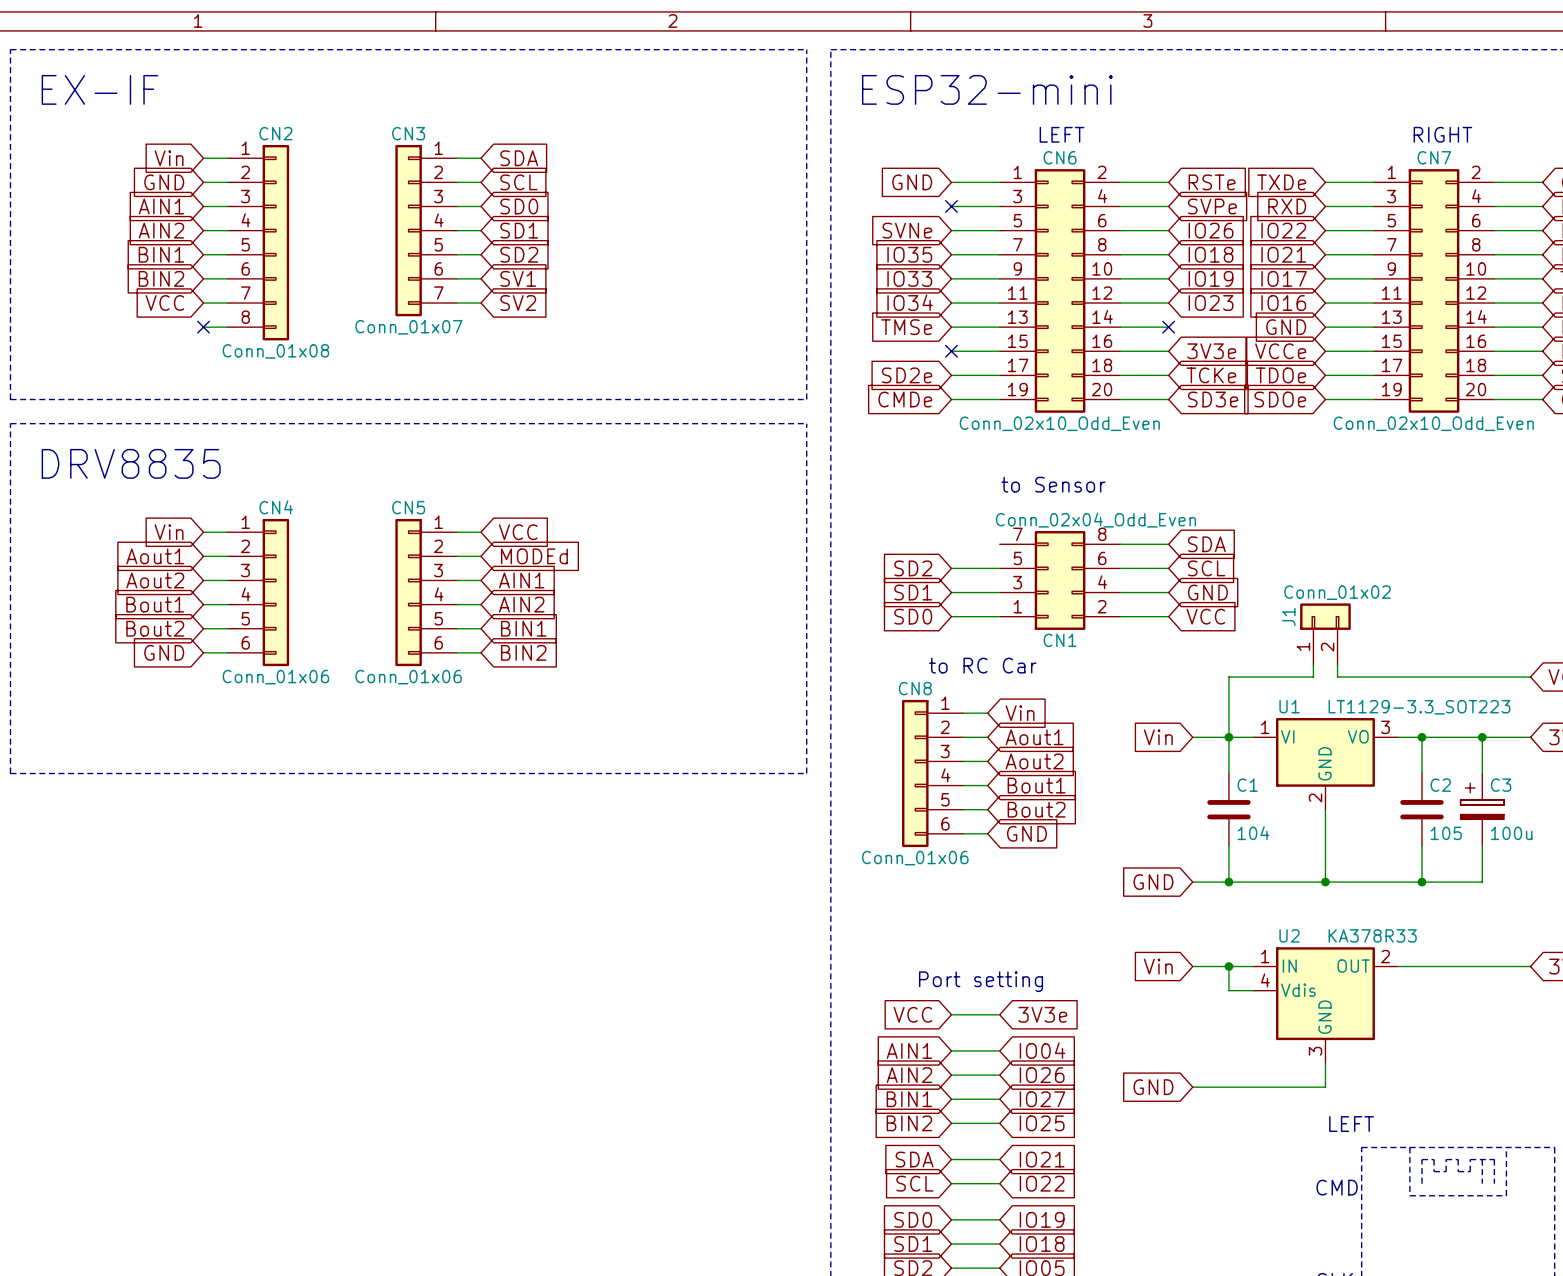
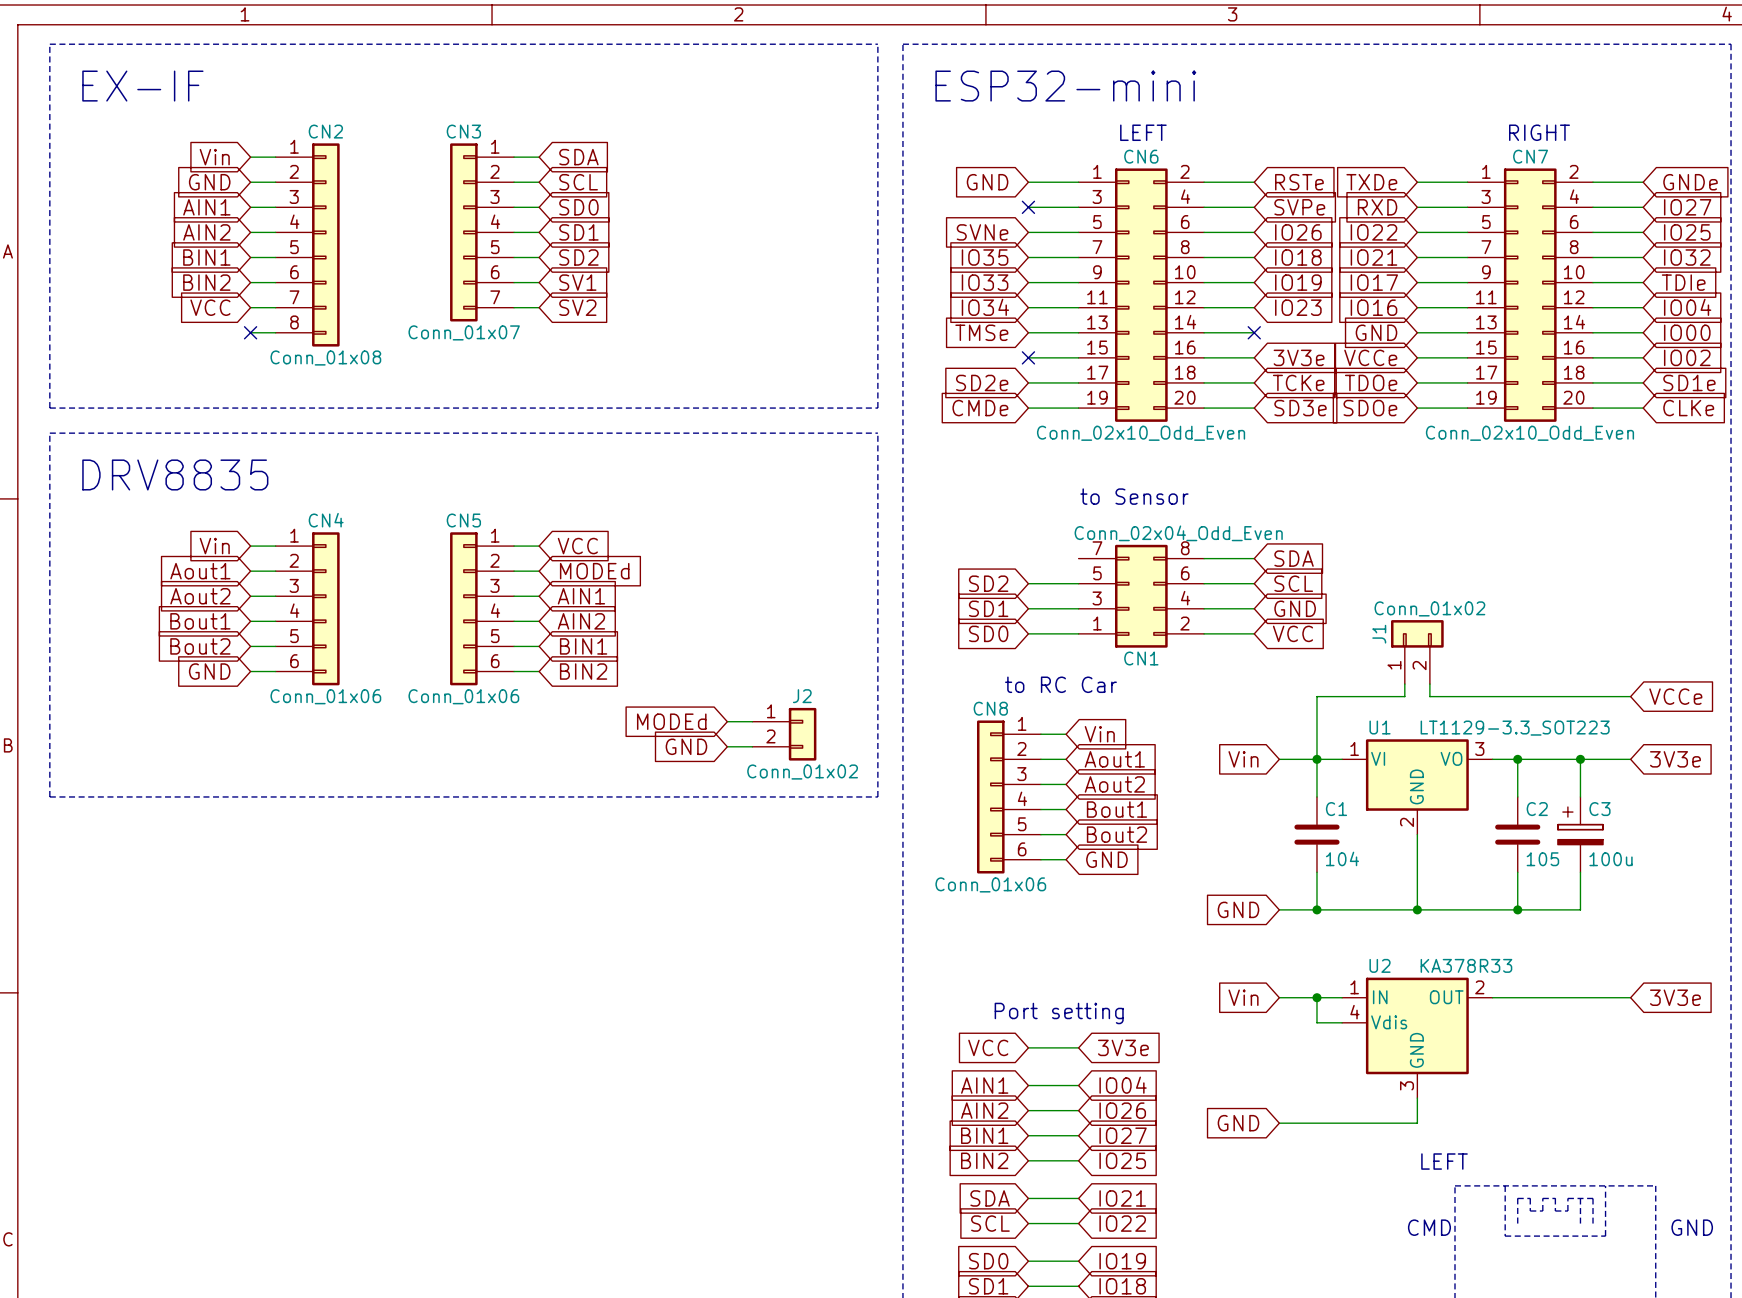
global label: none -> MODEd (671, 721)
wire: none -> (727, 721) (752, 721)
J2: none -> Conn_01x02 (784, 734)
global label: none -> GND (686, 746)
wire: none -> (727, 746) (752, 746)

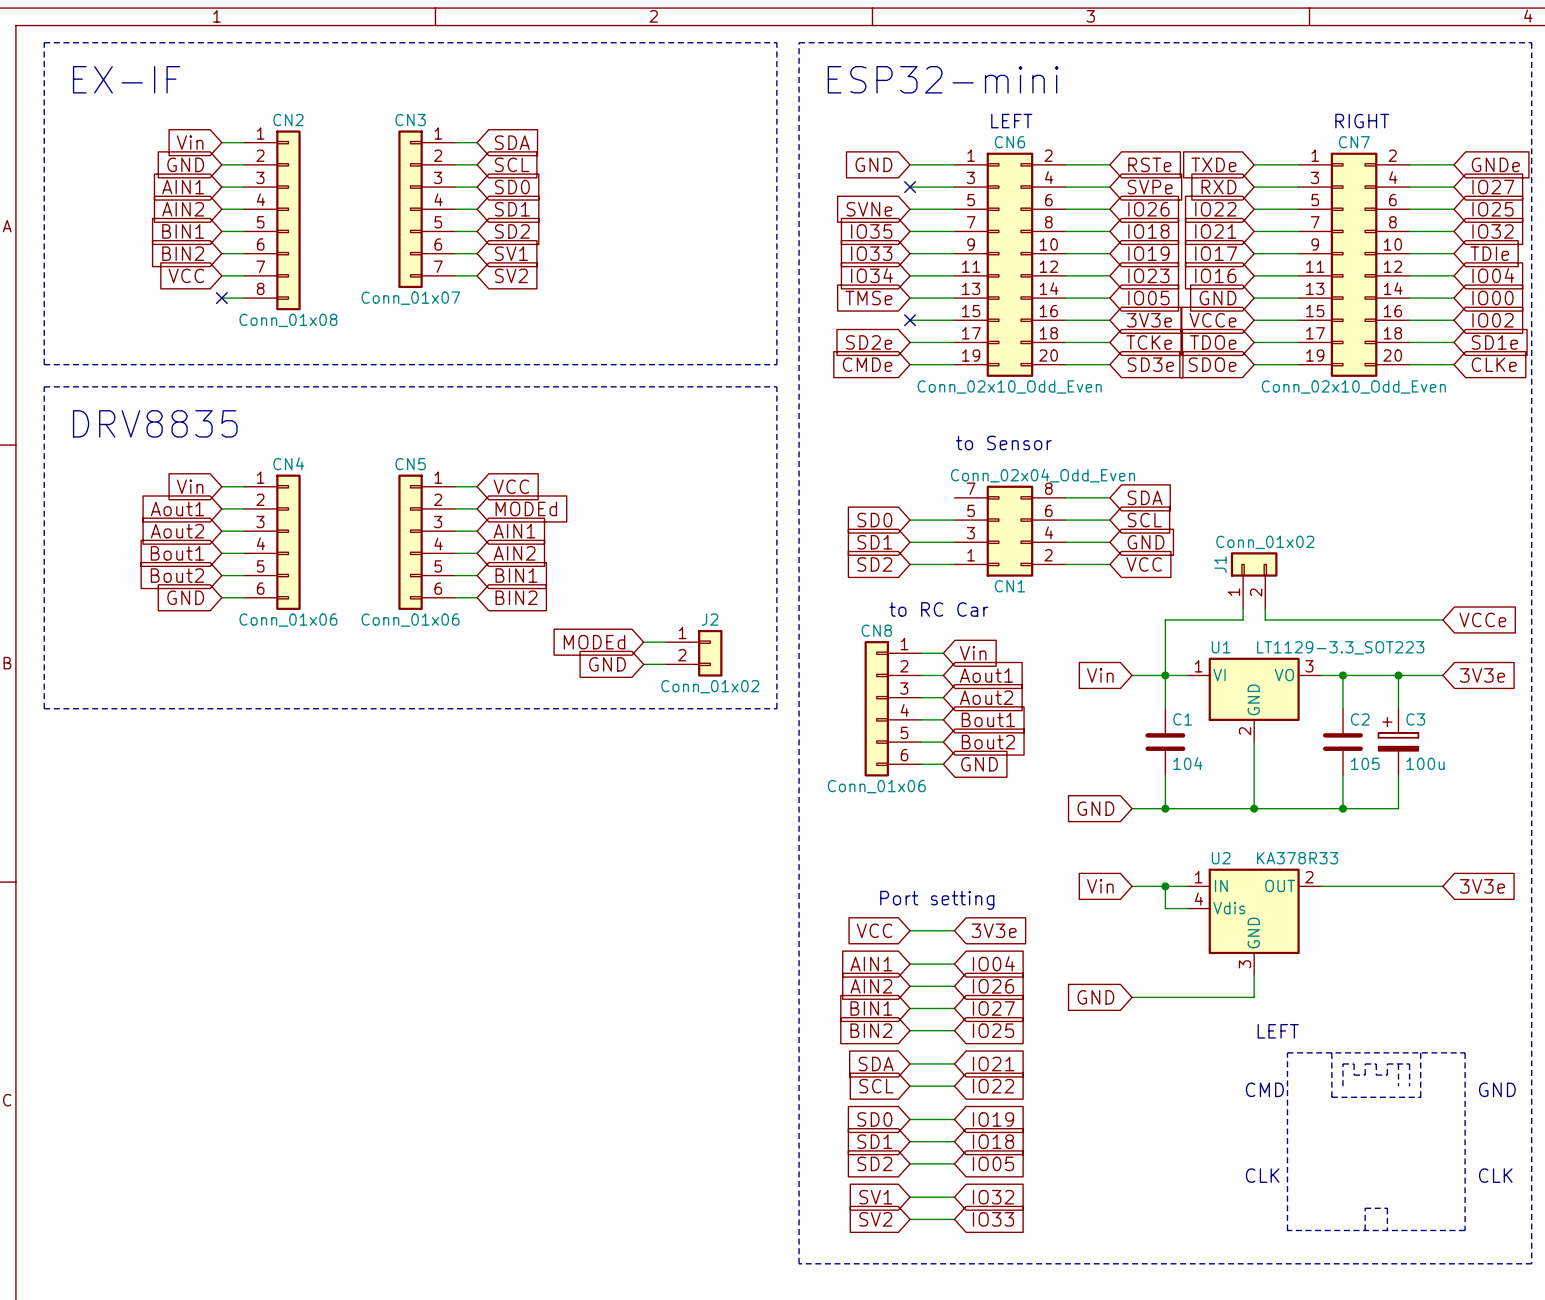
no-connect mark: (1254, 332) -> none
global label: none -> IO05 (1148, 298)
global label: SD2 (988, 583) -> SD0 (874, 520)
global label: SD0 (988, 633) -> SD2 (874, 564)

